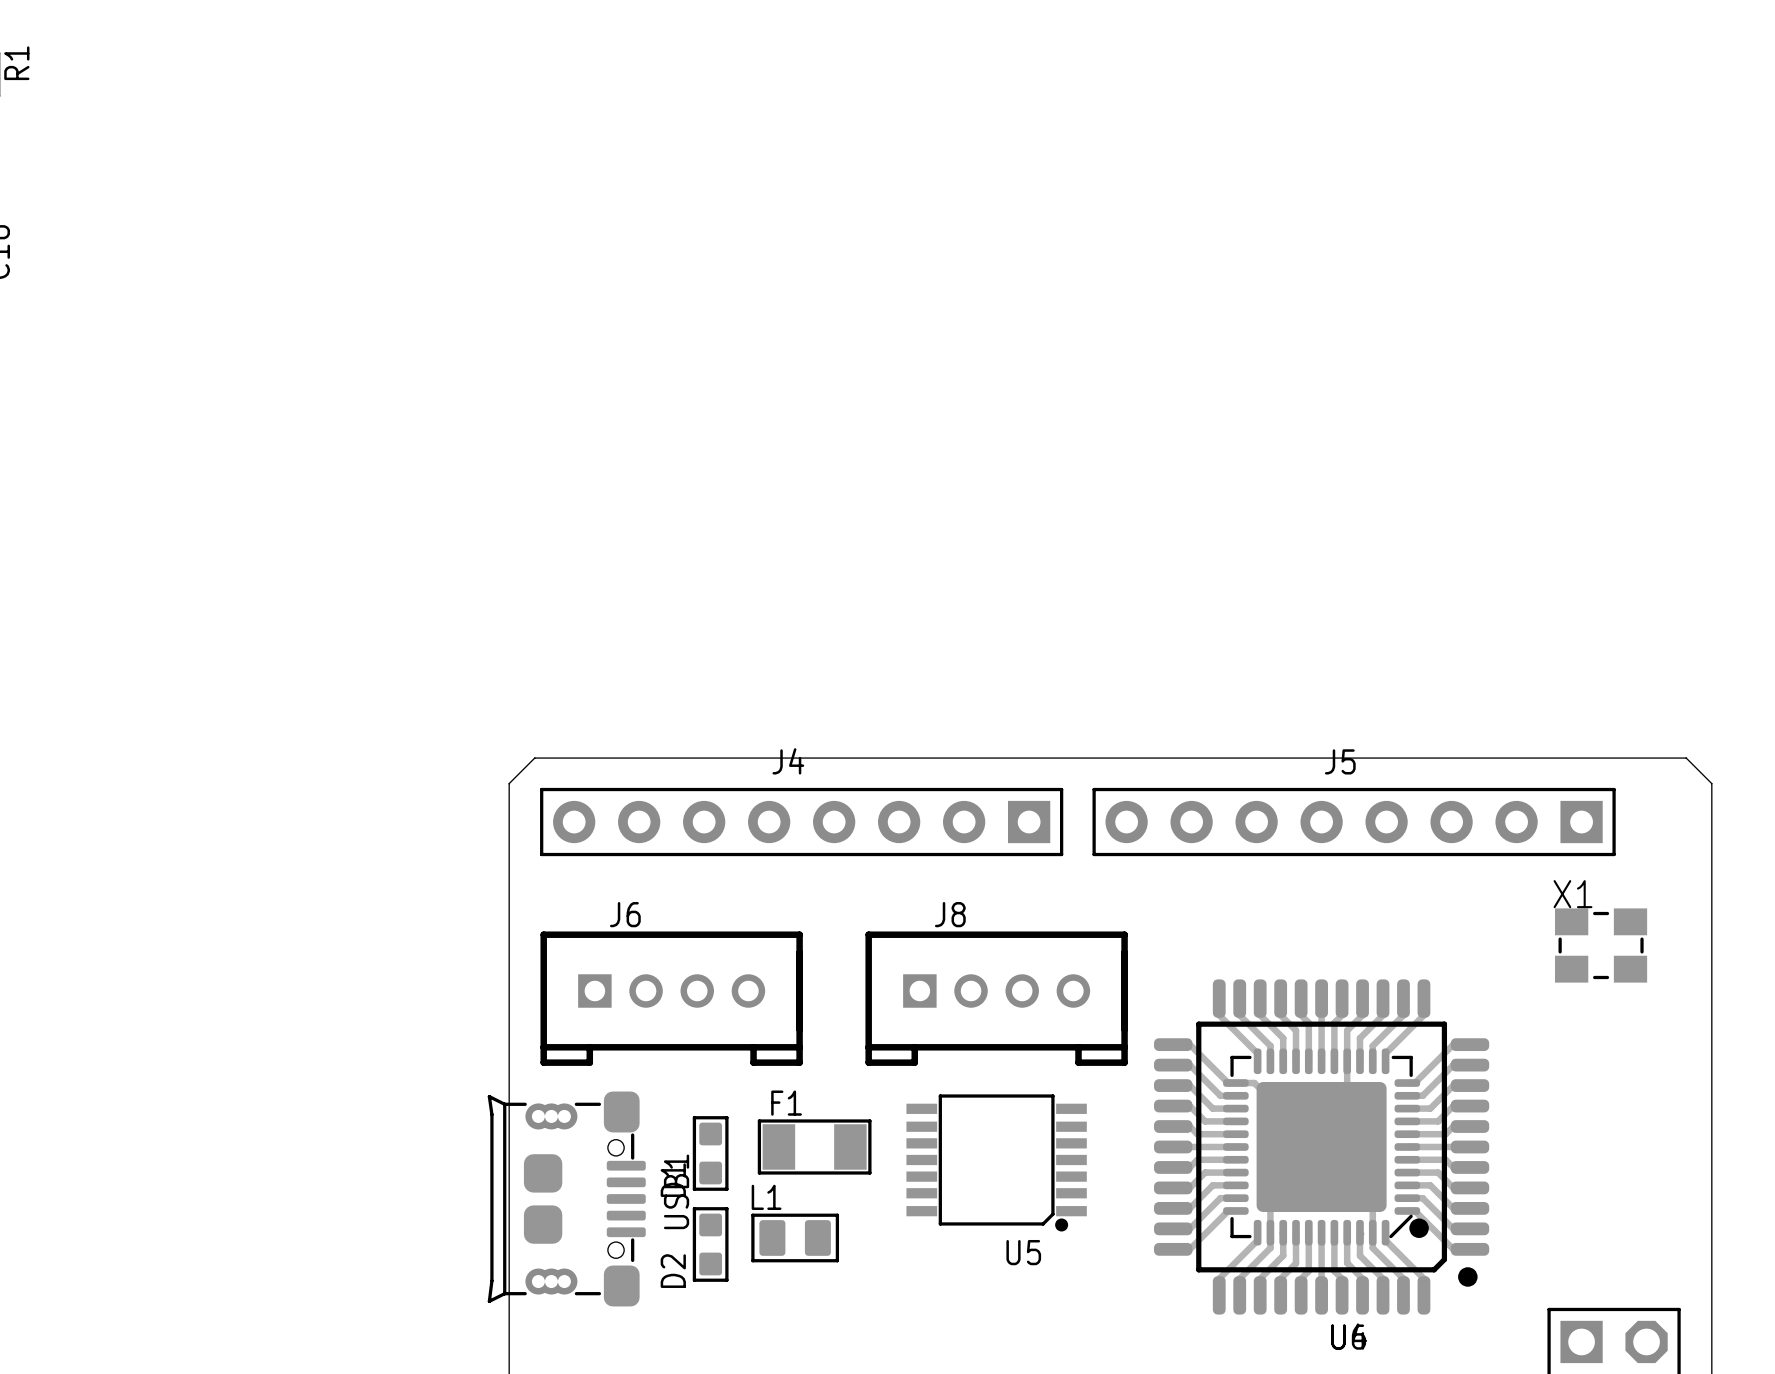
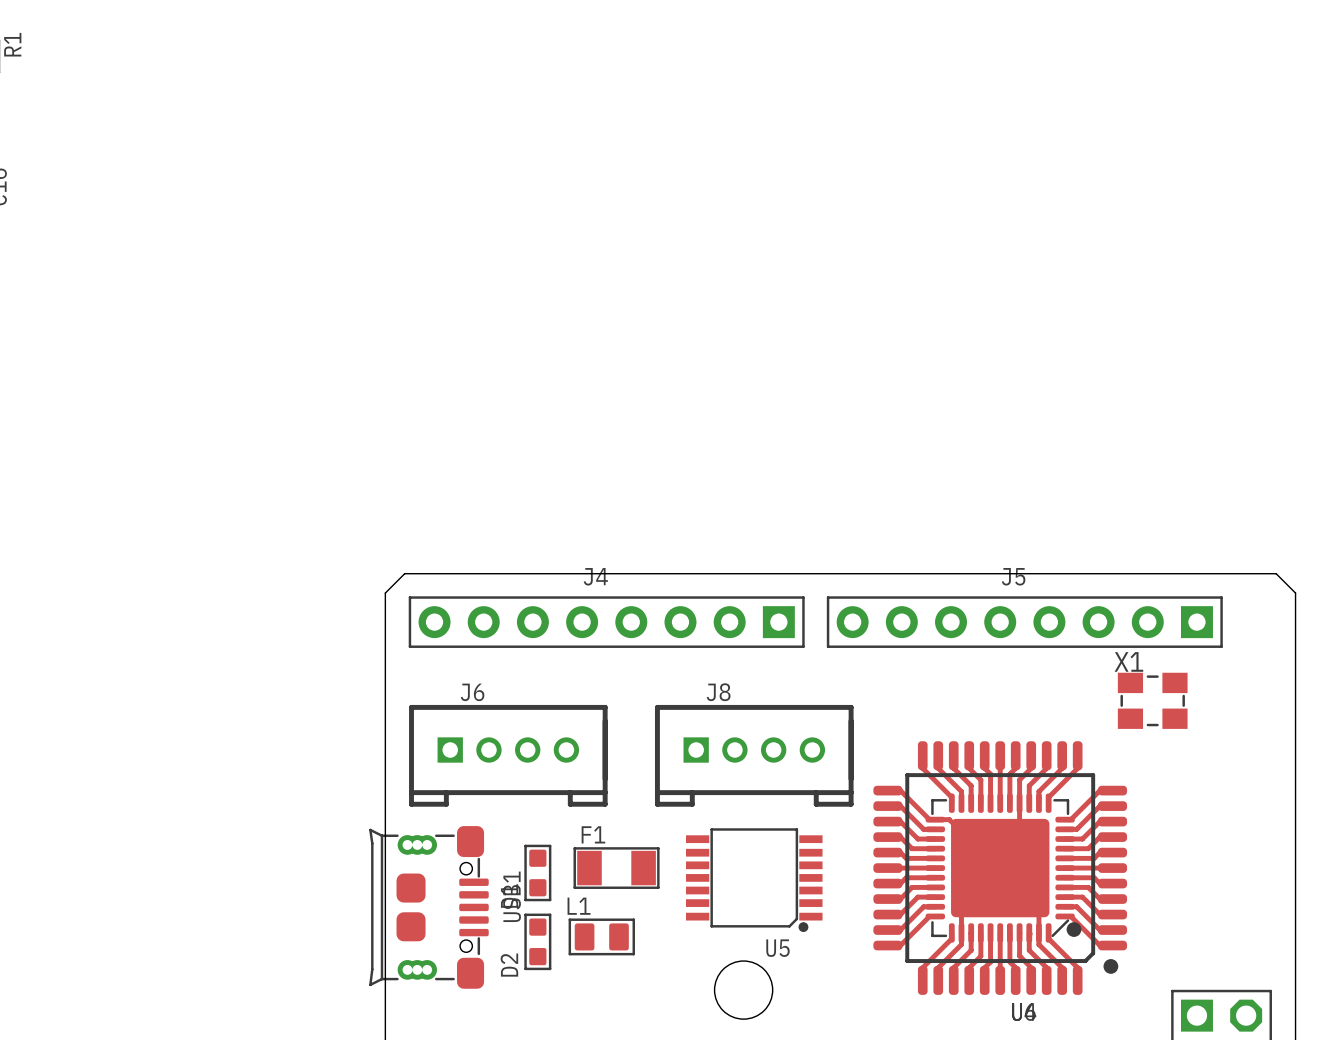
X1 position: (1601, 945) -> (1152, 700)
round board edge: none -> [714, 961, 773, 1020]

